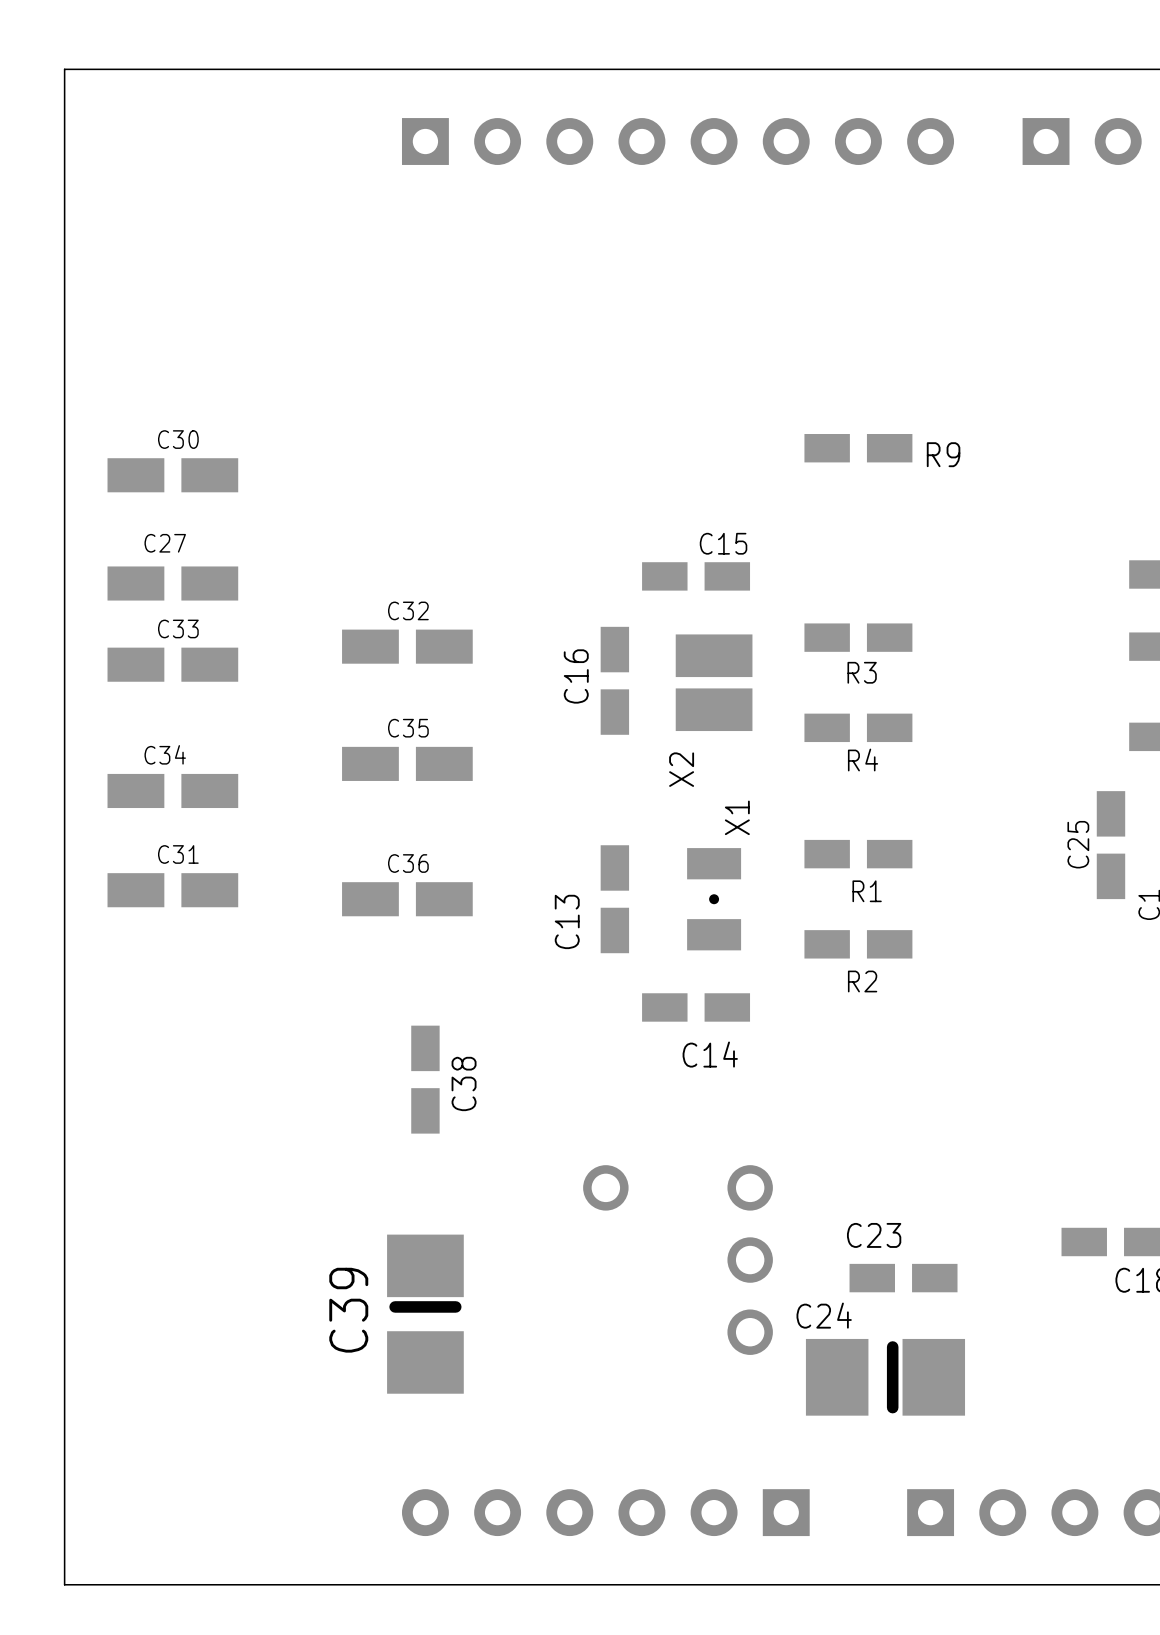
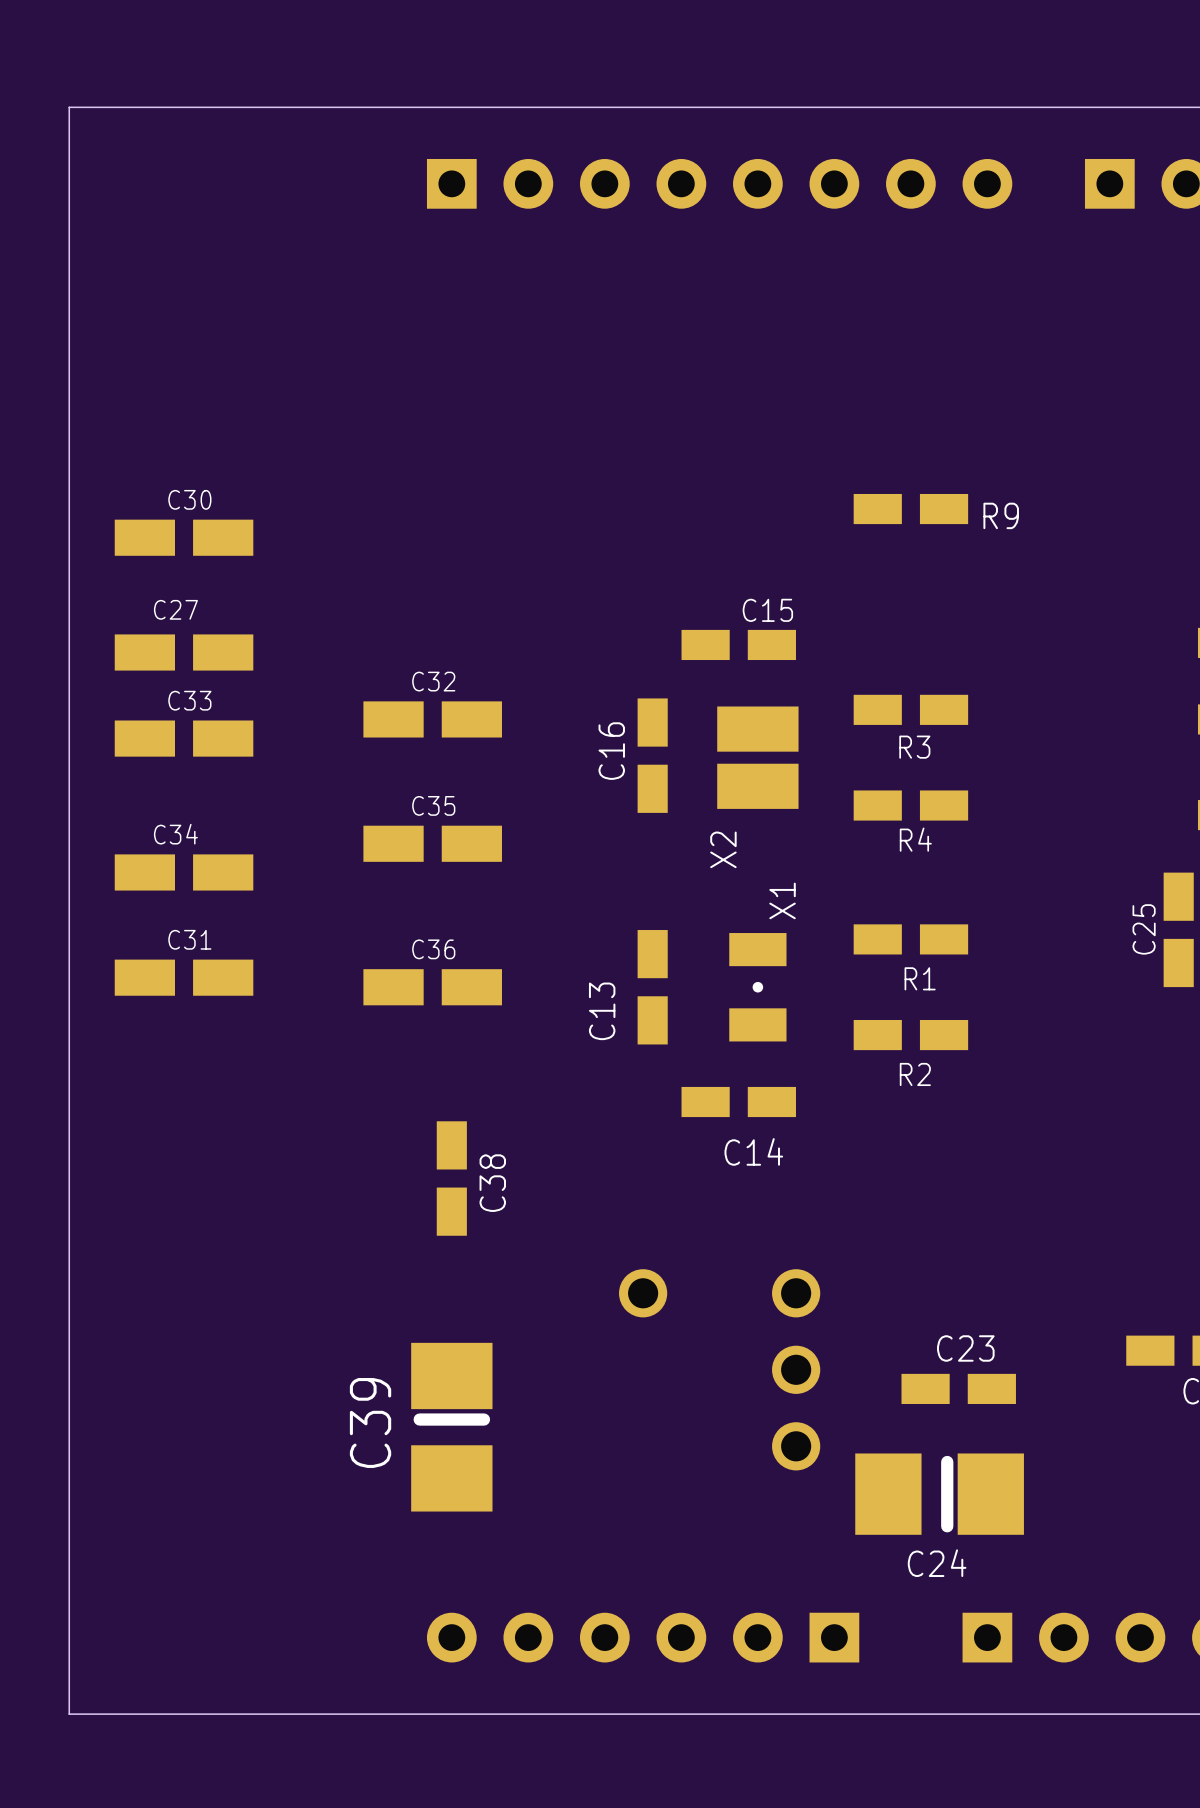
C23 name position: C23 (874, 1235) -> C23 (965, 1348)
C24 name position: C24 (824, 1315) -> C24 (937, 1563)

